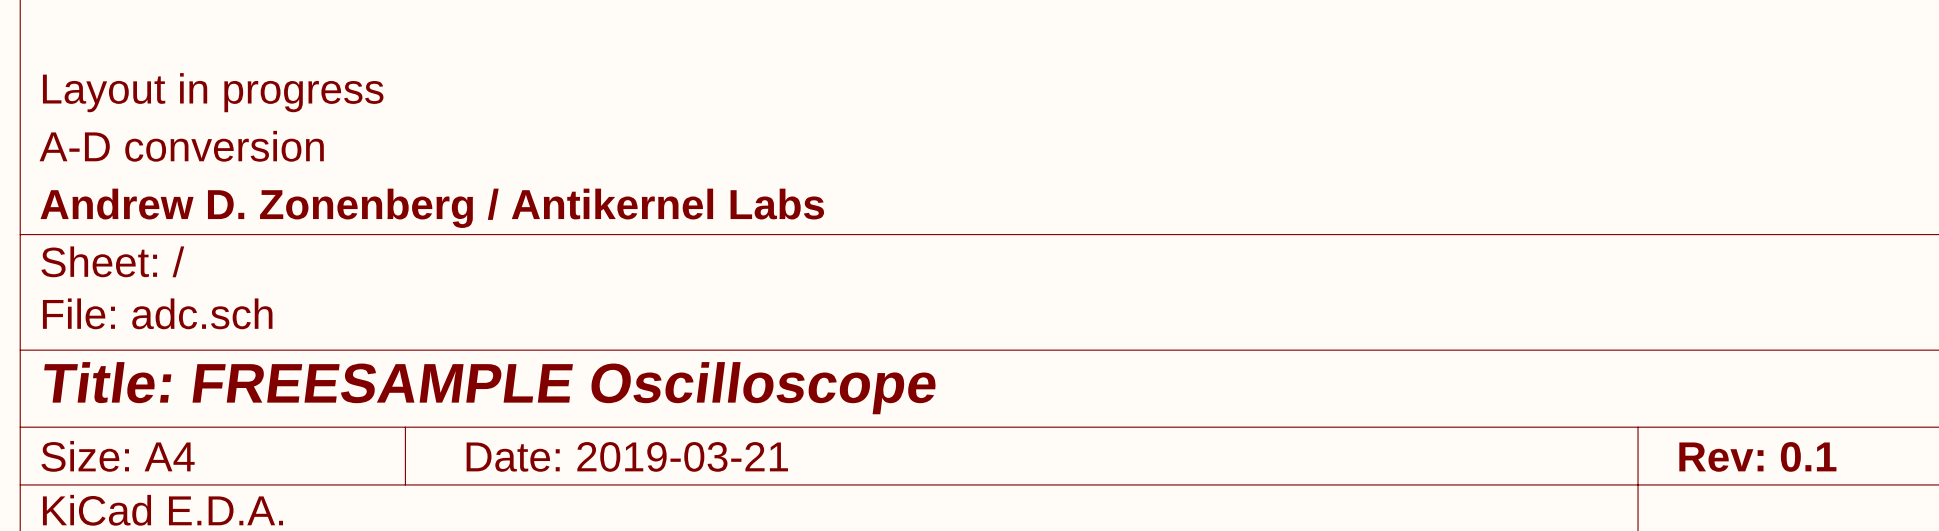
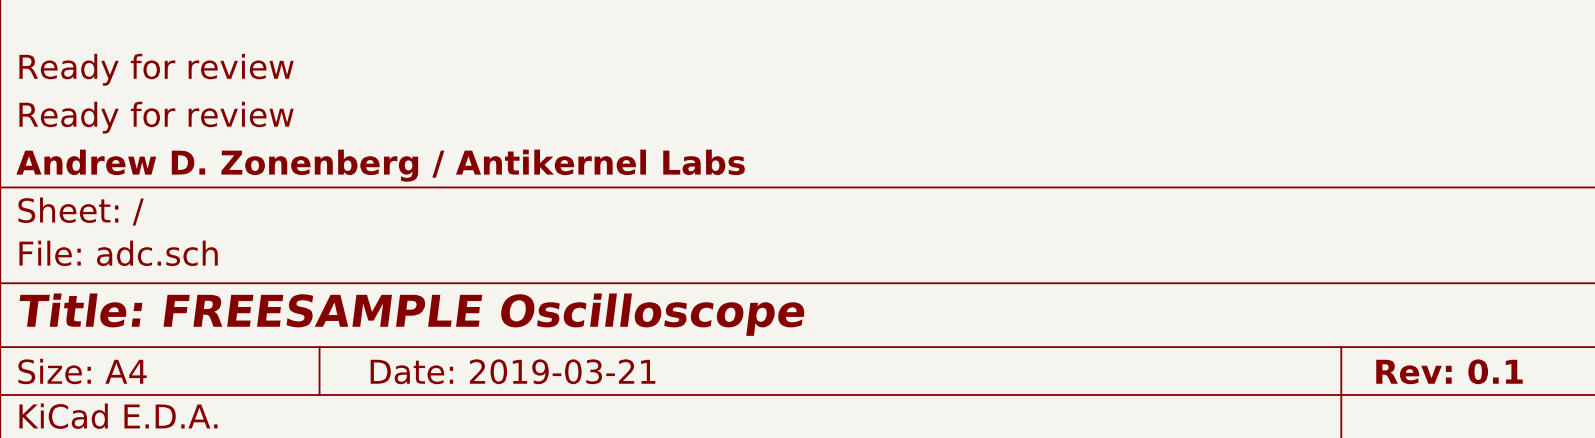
title block: Layout in progress (213, 92) -> Ready for review (156, 69)
title block: A-D conversion (181, 146) -> Ready for review (156, 117)

